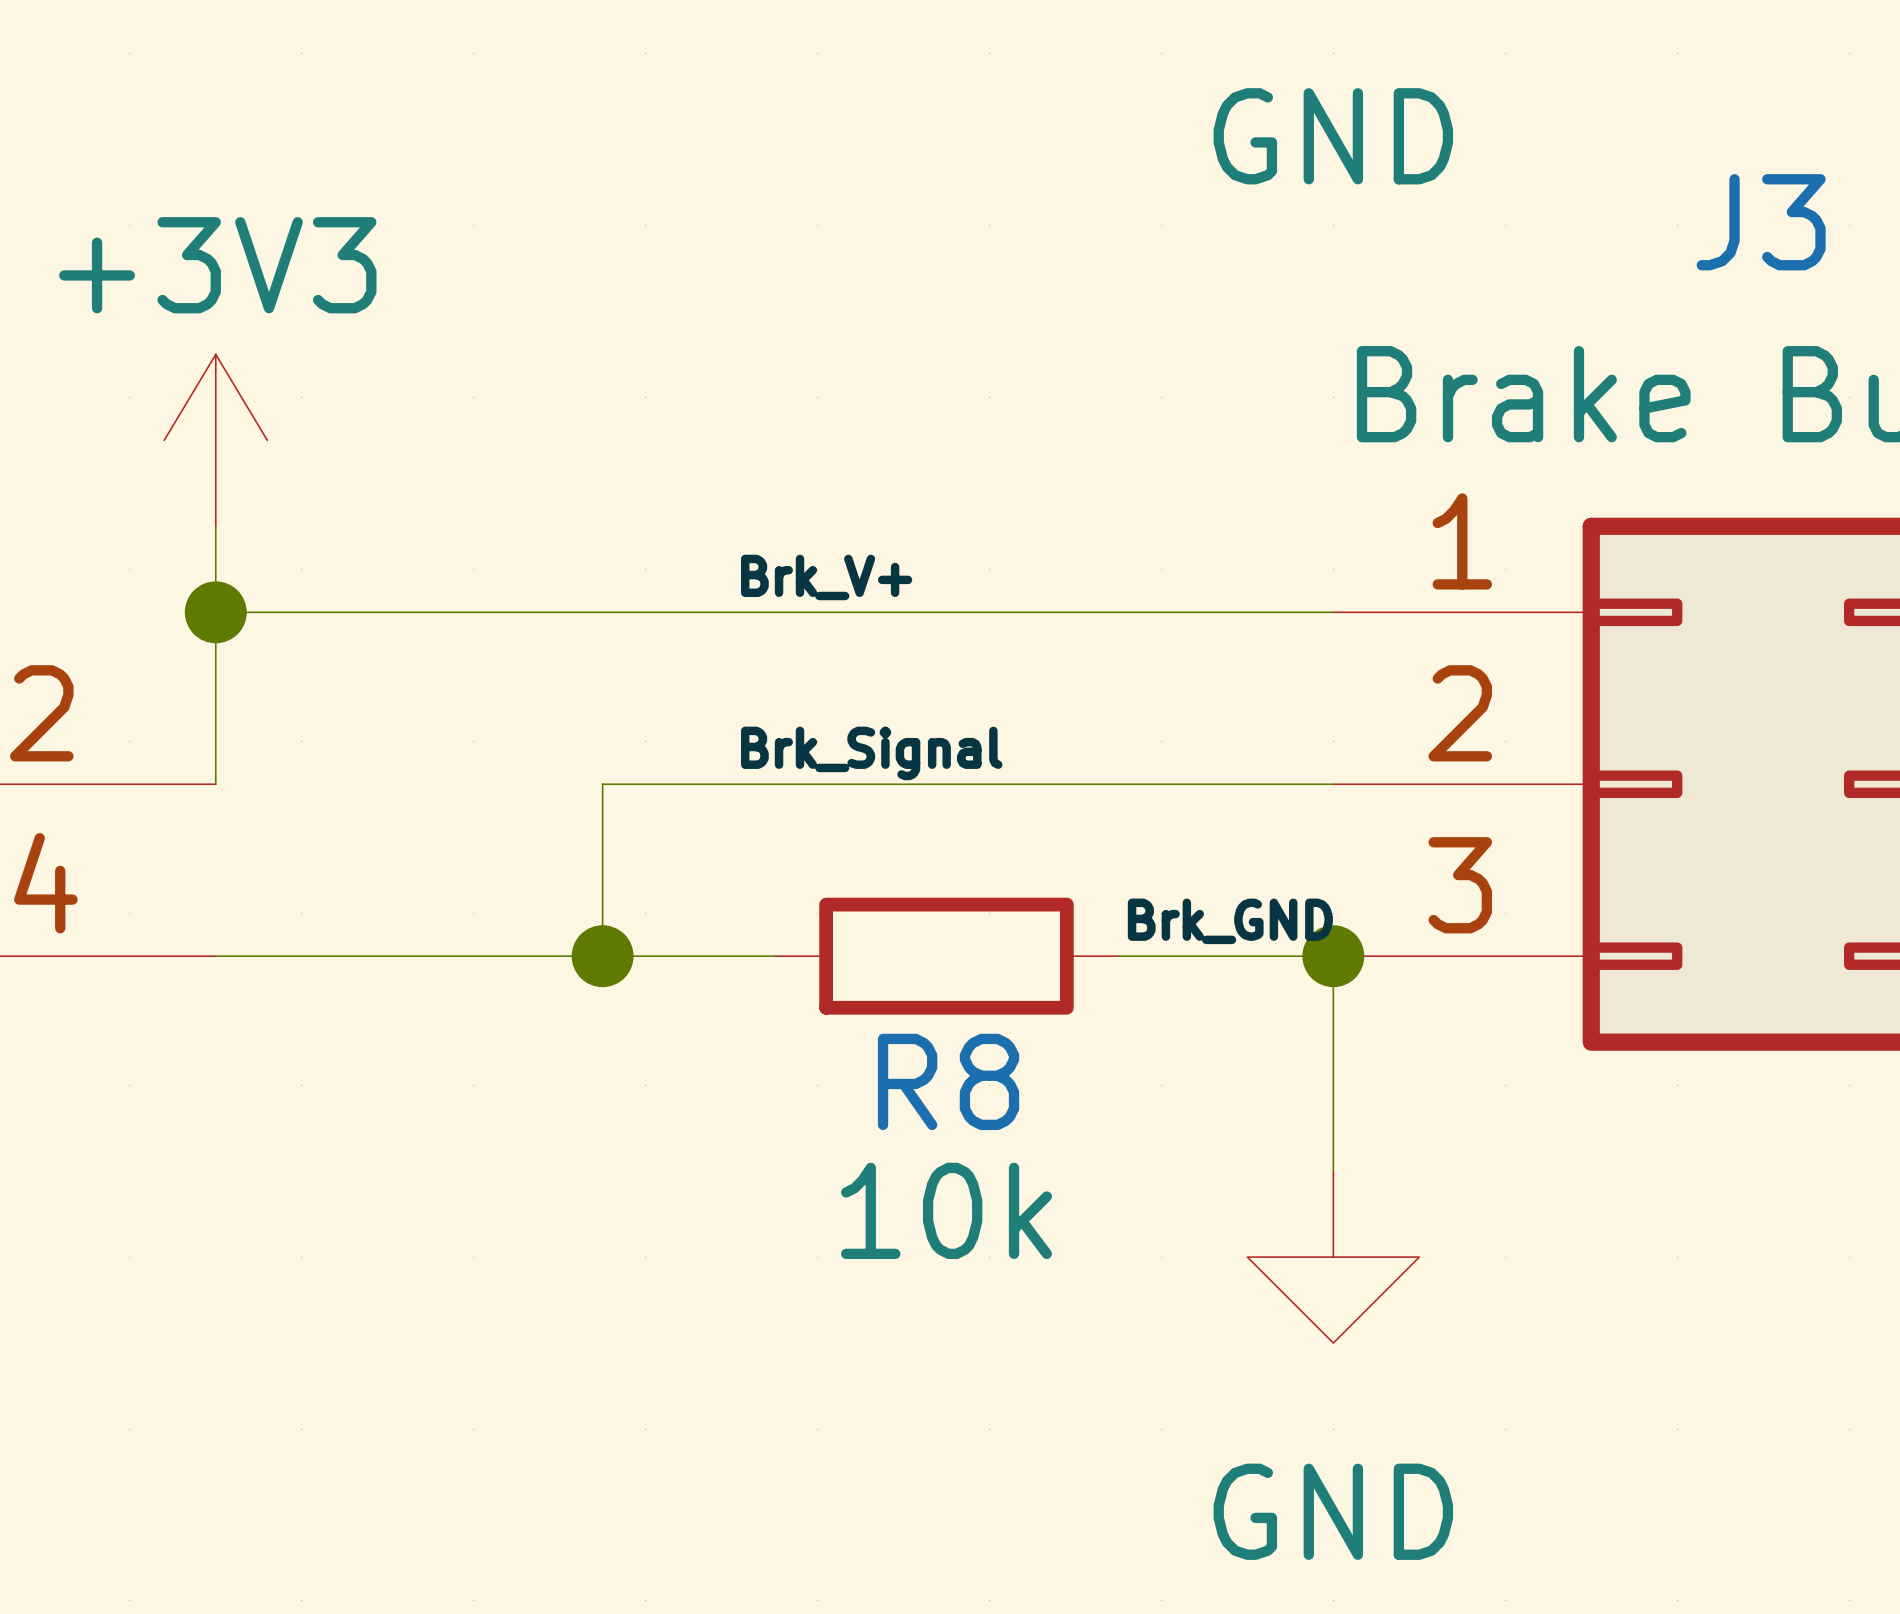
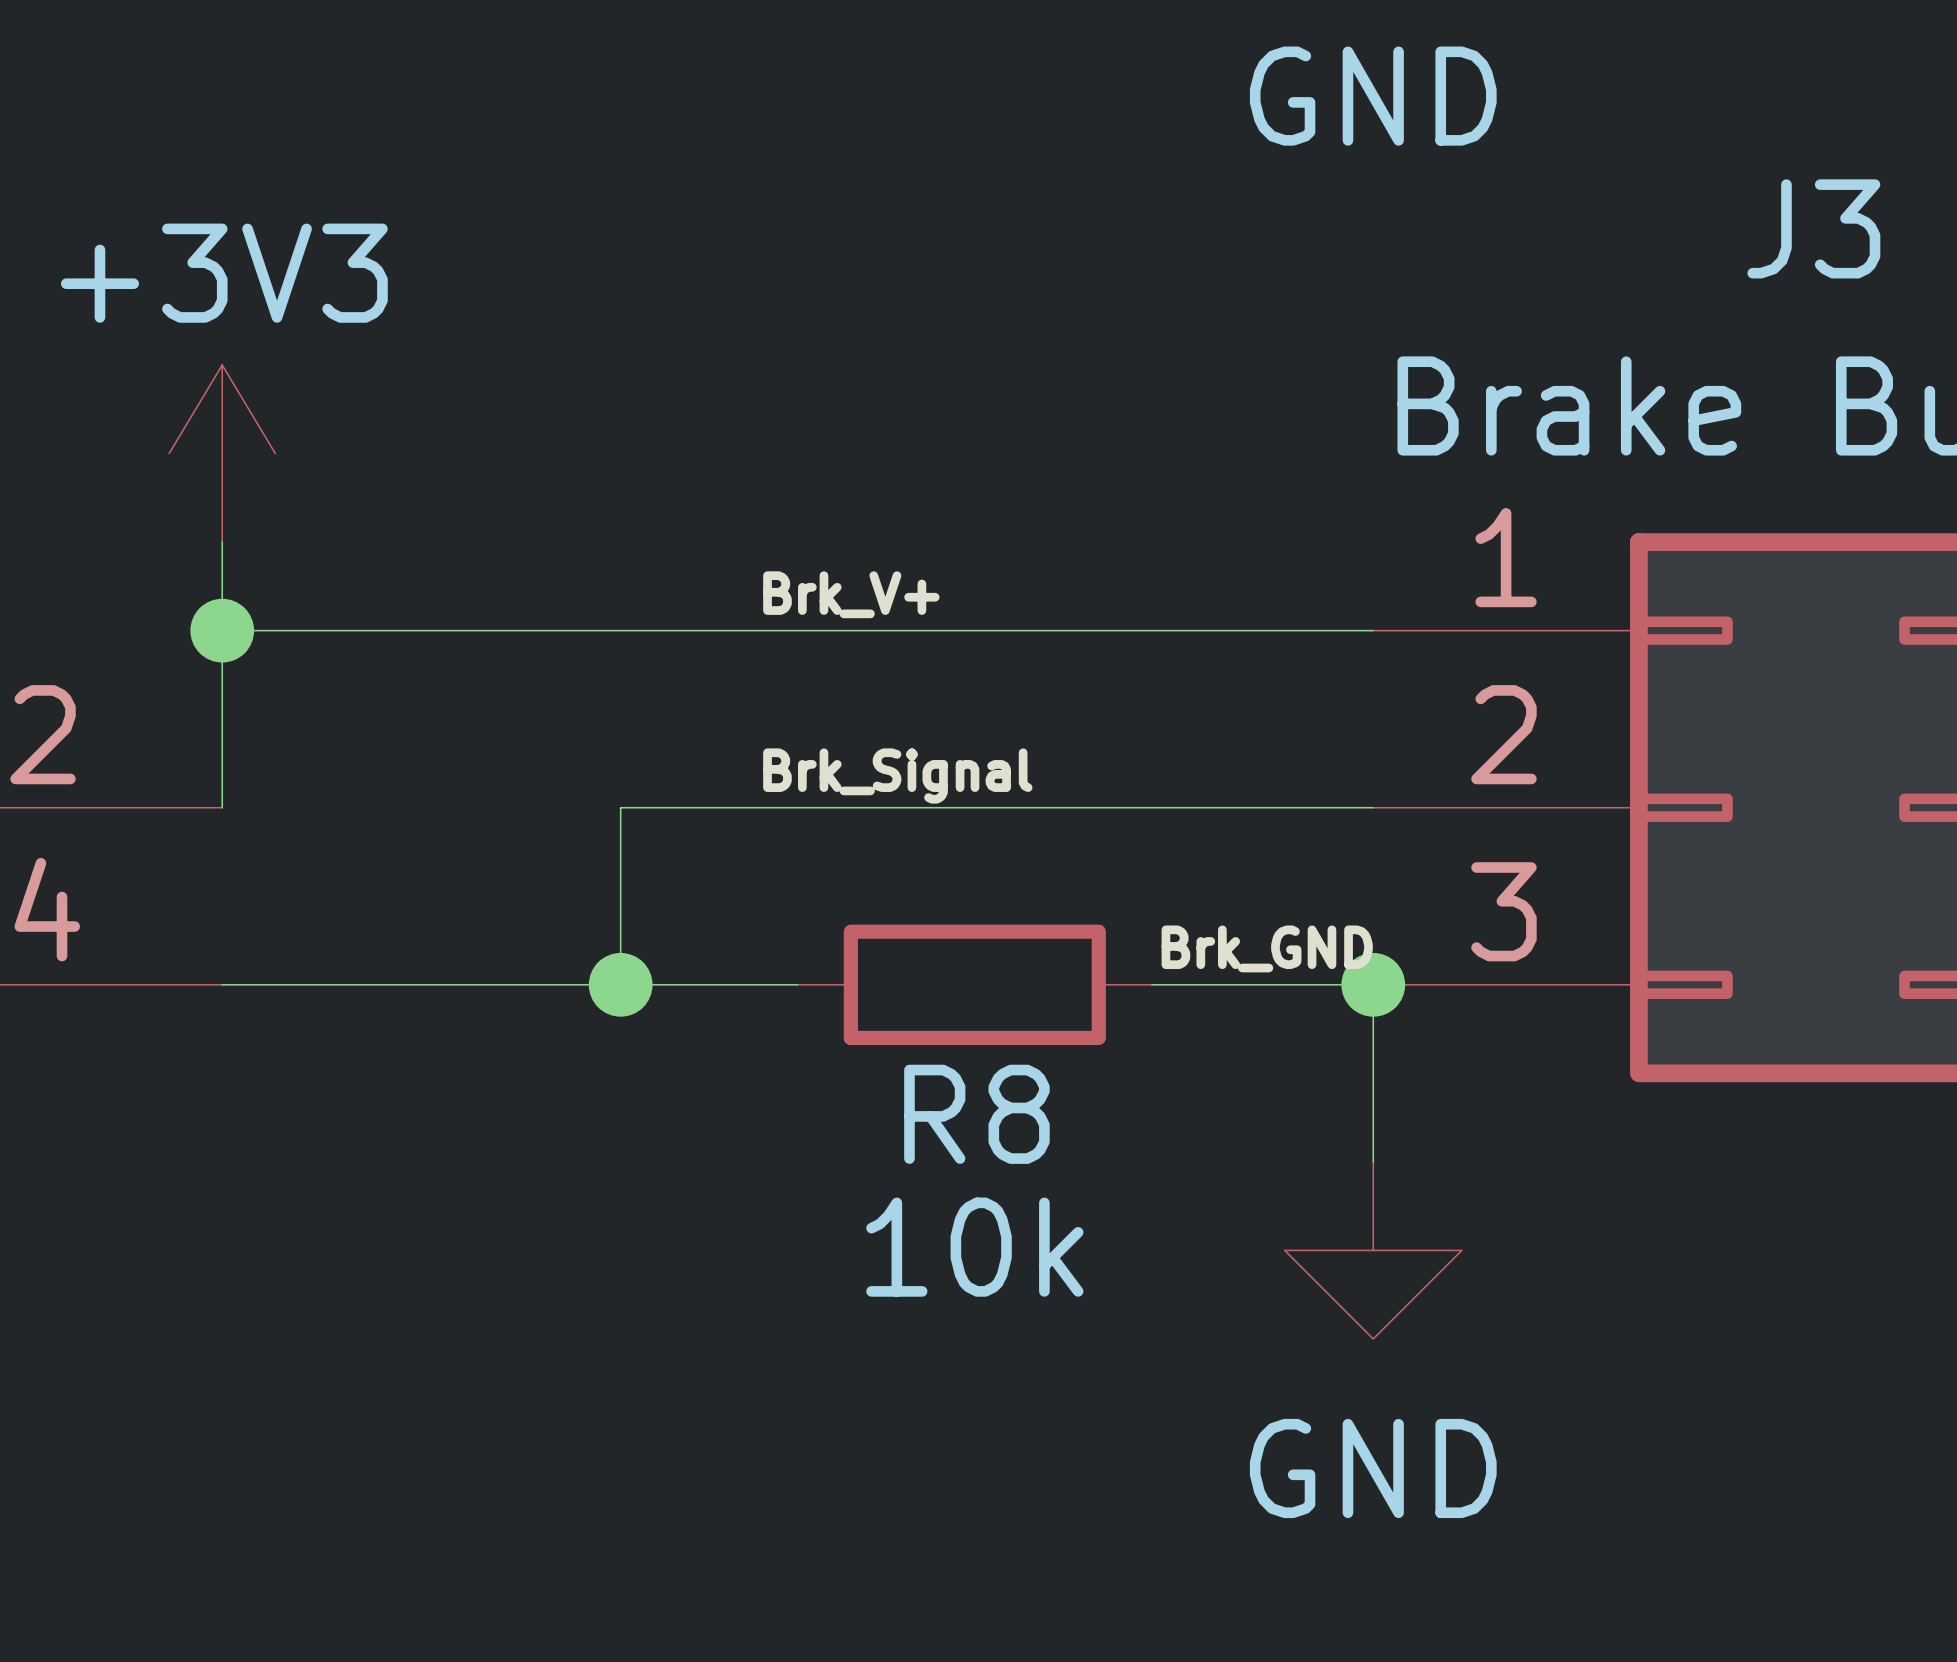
power symbol text position: GND (1333, 136) -> GND (1373, 96)
power symbol position: GND (1333, 1257) -> GND (1373, 1250)
power symbol text position: GND (1333, 1511) -> GND (1373, 1468)

